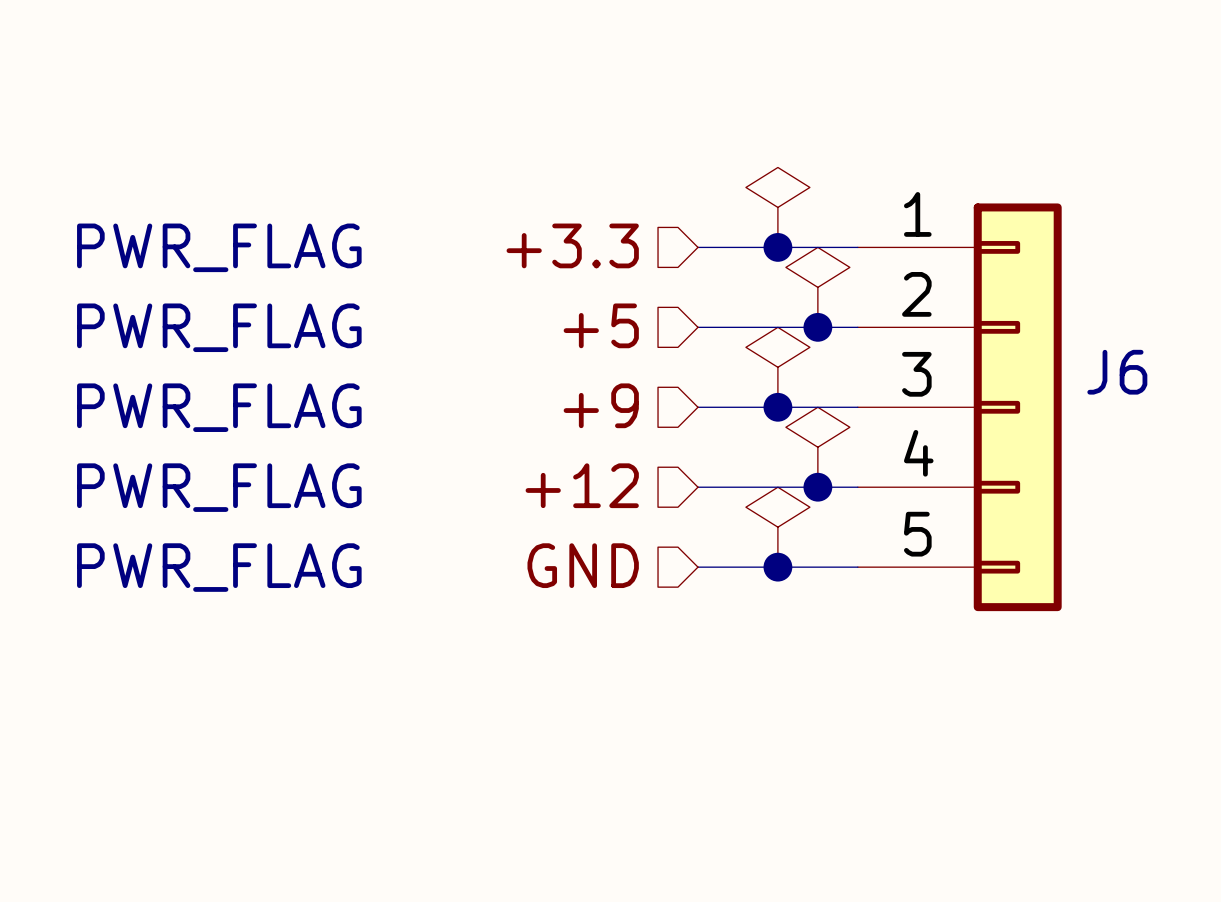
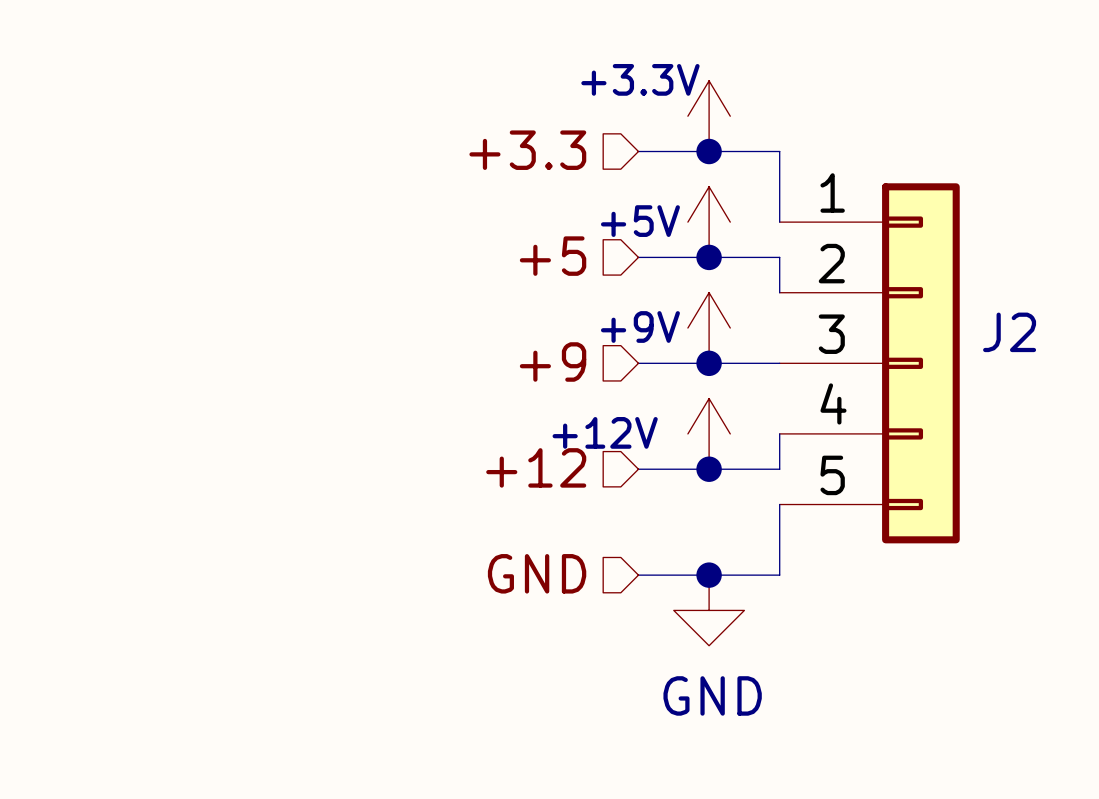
power symbol: none -> +3.3V (709, 116)
junction: none -> (709, 151)
power symbol: PWR_FLAG (777, 207) -> none
hierarchical label position: +3.3 (572, 245) -> +3.3 (527, 150)
wire: (697, 247) (857, 247) -> (638, 151) (779, 151) (779, 222)
power symbol: none -> +5V (709, 222)
junction: (777, 247) -> none
junction: none -> (709, 257)
power symbol: PWR_FLAG (817, 287) -> none
hierarchical label position: +5 (601, 325) -> +5 (553, 256)
wire: (697, 327) (857, 327) -> (638, 257) (779, 257) (779, 292)
junction: (817, 327) -> none
power symbol: PWR_FLAG (777, 367) -> +9V (709, 328)
J6 name: J6 (1117, 372) -> J2 (1009, 332)
power symbol: PWR_FLAG (817, 447) -> none
hierarchical label position: +12 (582, 485) -> +12 (536, 467)
wire: (697, 487) (857, 487) -> (638, 469) (779, 469) (779, 433)
power symbol: none -> +12V (709, 433)
junction: (817, 487) -> none
power symbol: PWR_FLAG (777, 527) -> none
junction: none -> (709, 469)
hierarchical label position: GND (583, 565) -> GND (537, 573)
wire: (697, 567) (857, 567) -> (638, 575) (779, 575) (779, 504)
junction: (777, 567) -> none
junction: none -> (709, 575)
power symbol: none -> GND (709, 610)

